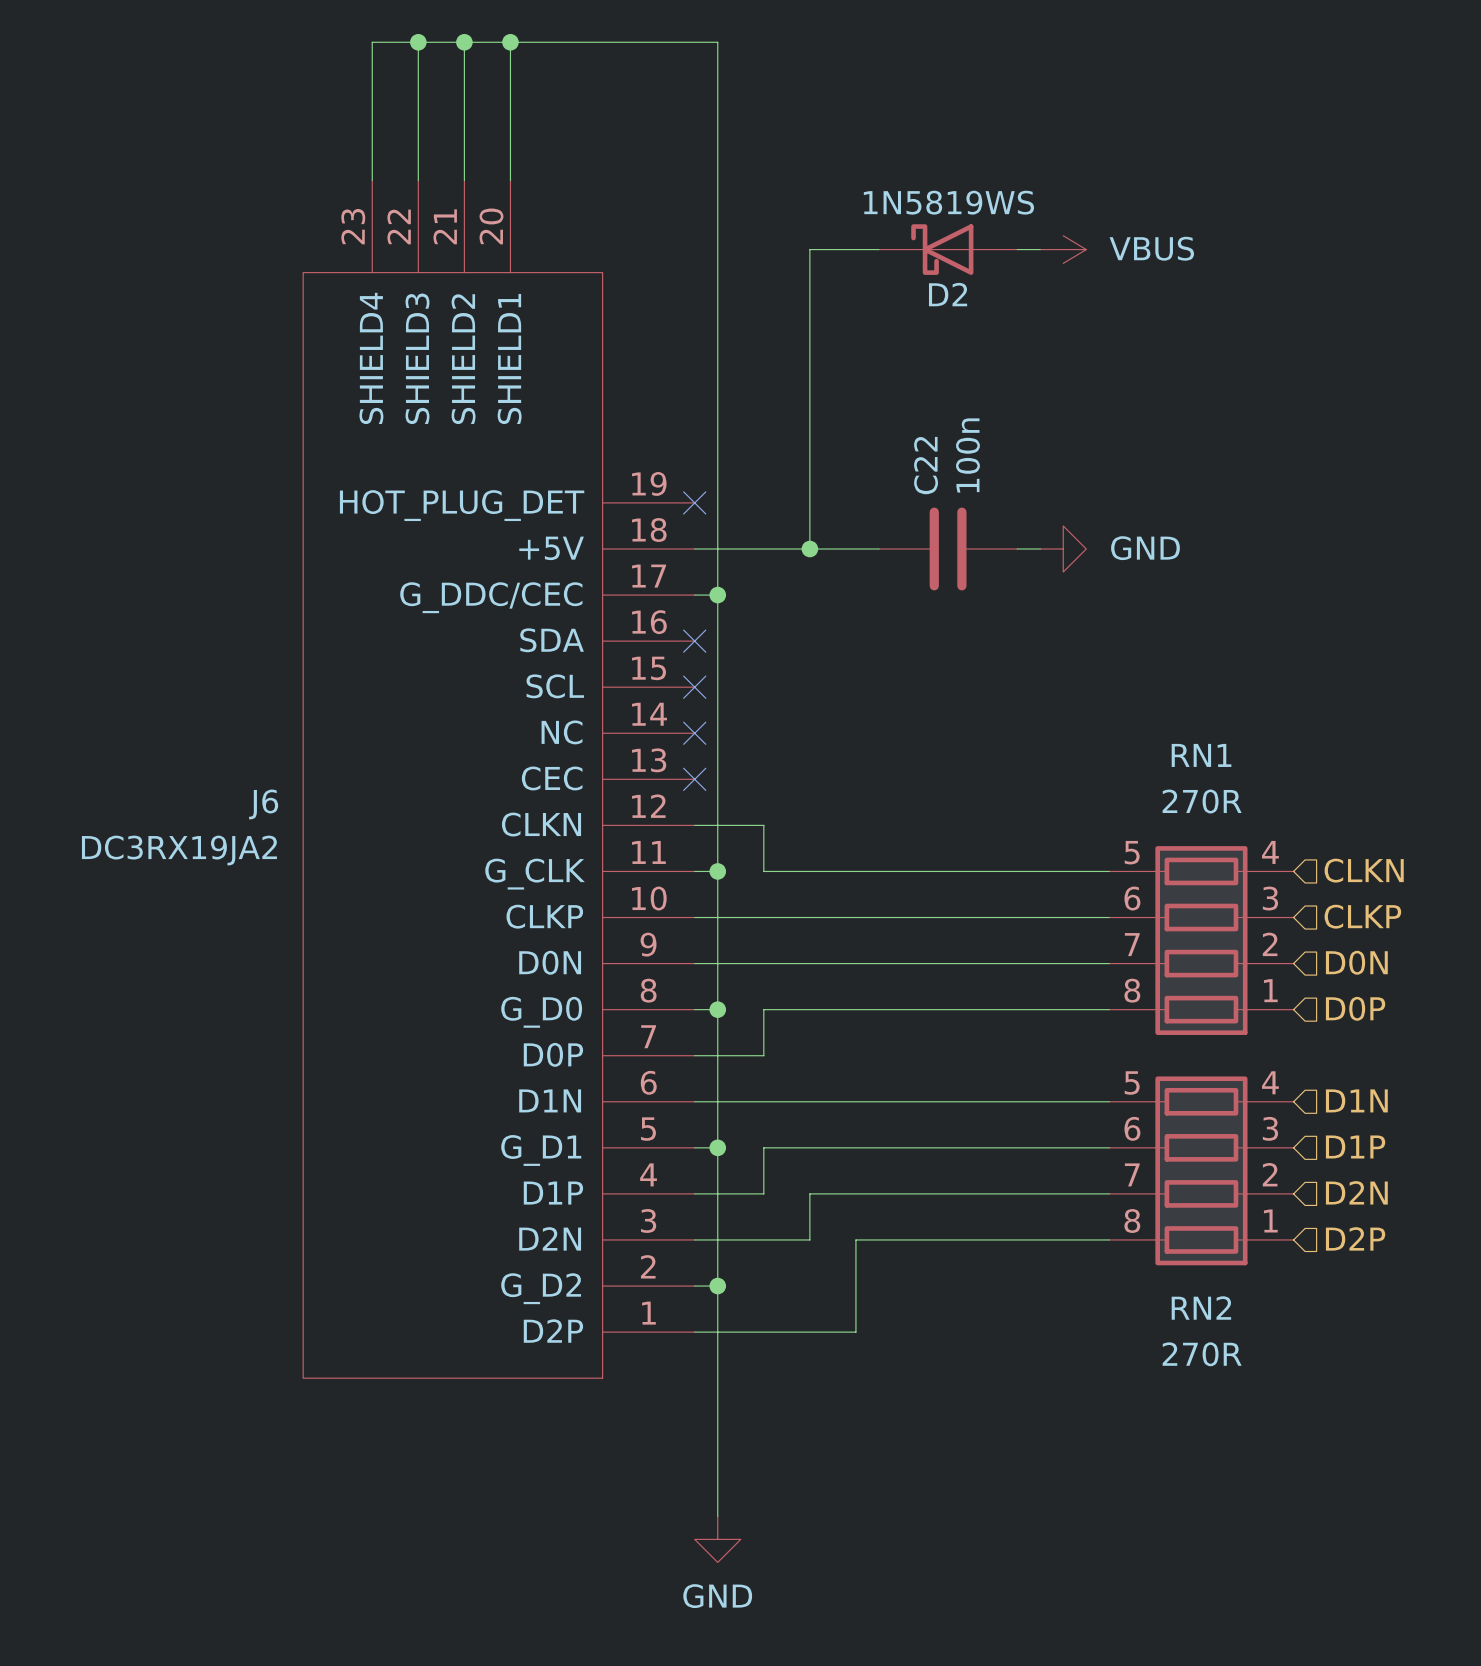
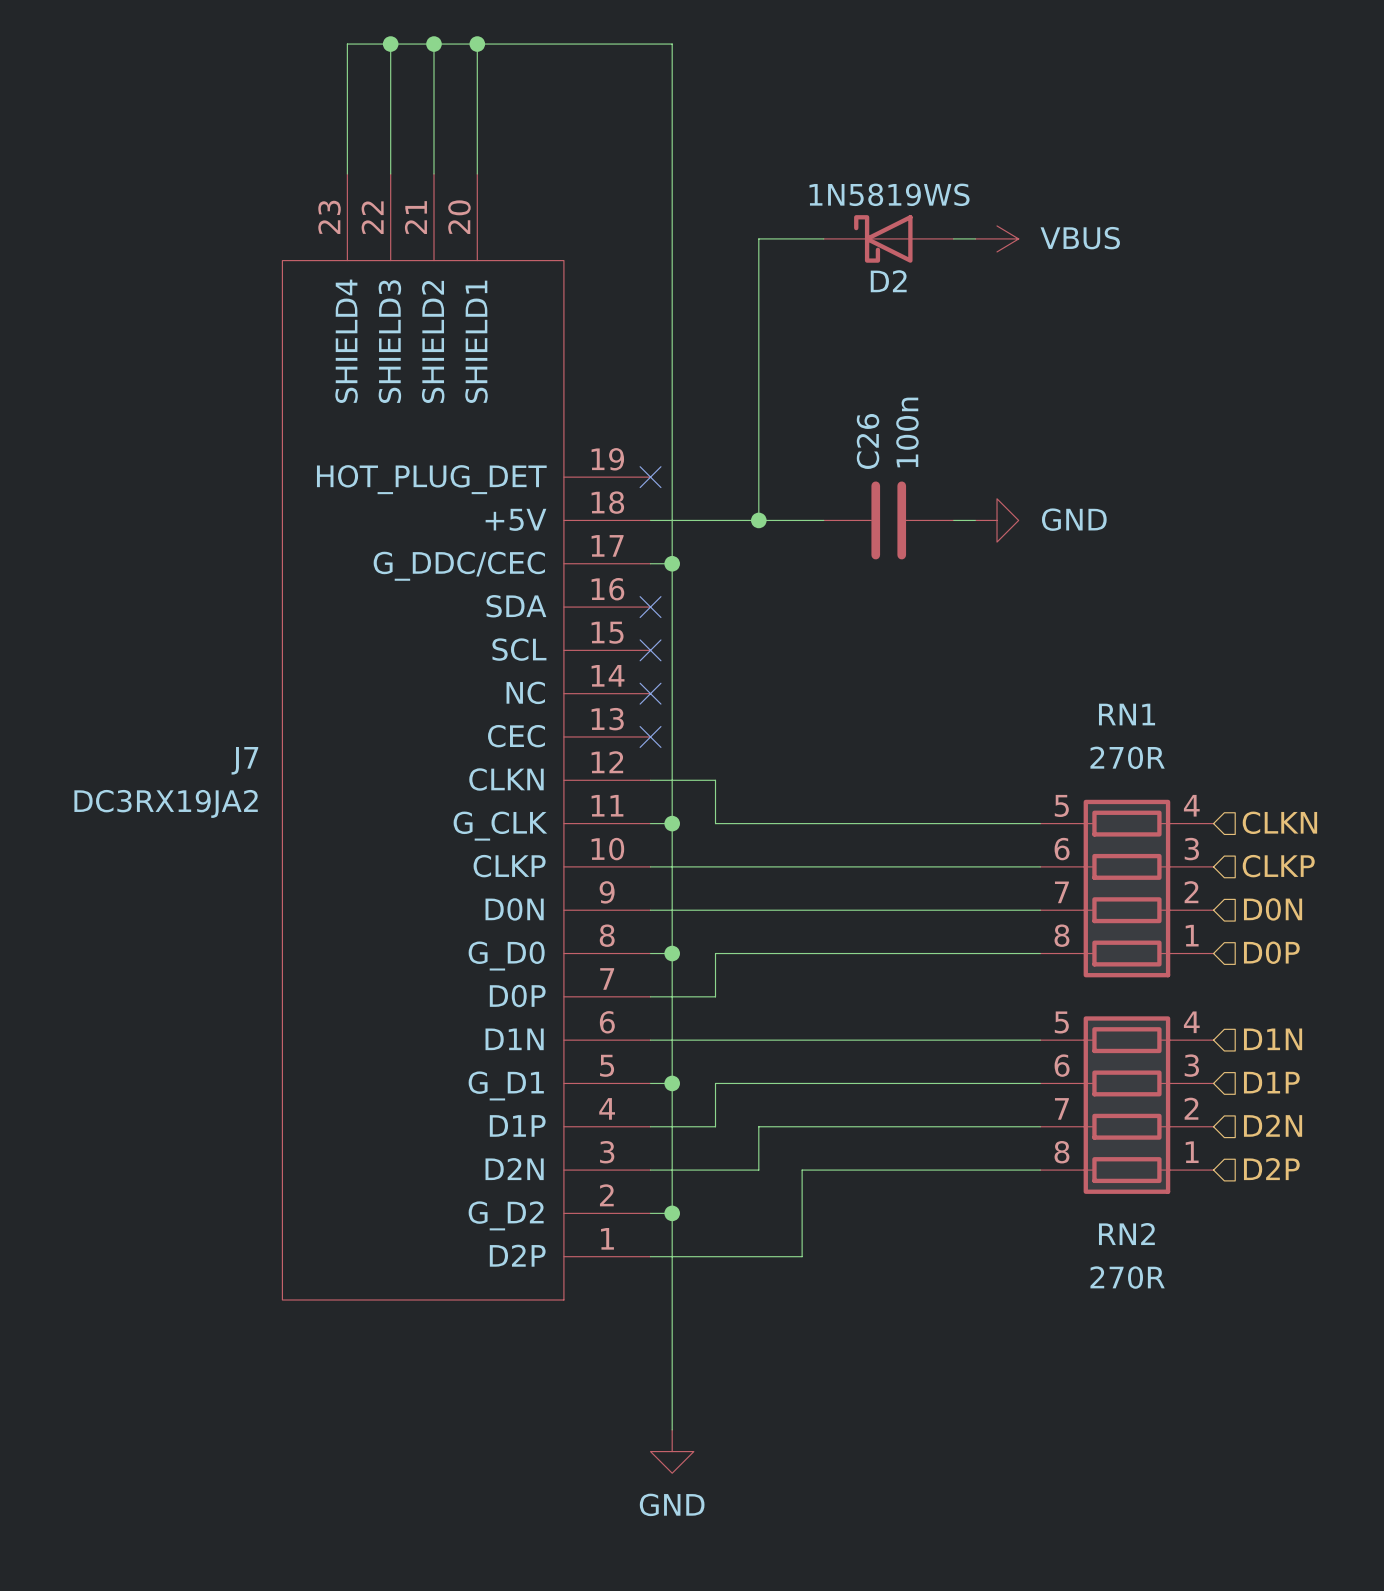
C22 name: C22 (926, 465) -> C26 (868, 441)
J6 name: J6 (263, 804) -> J7 (244, 760)

